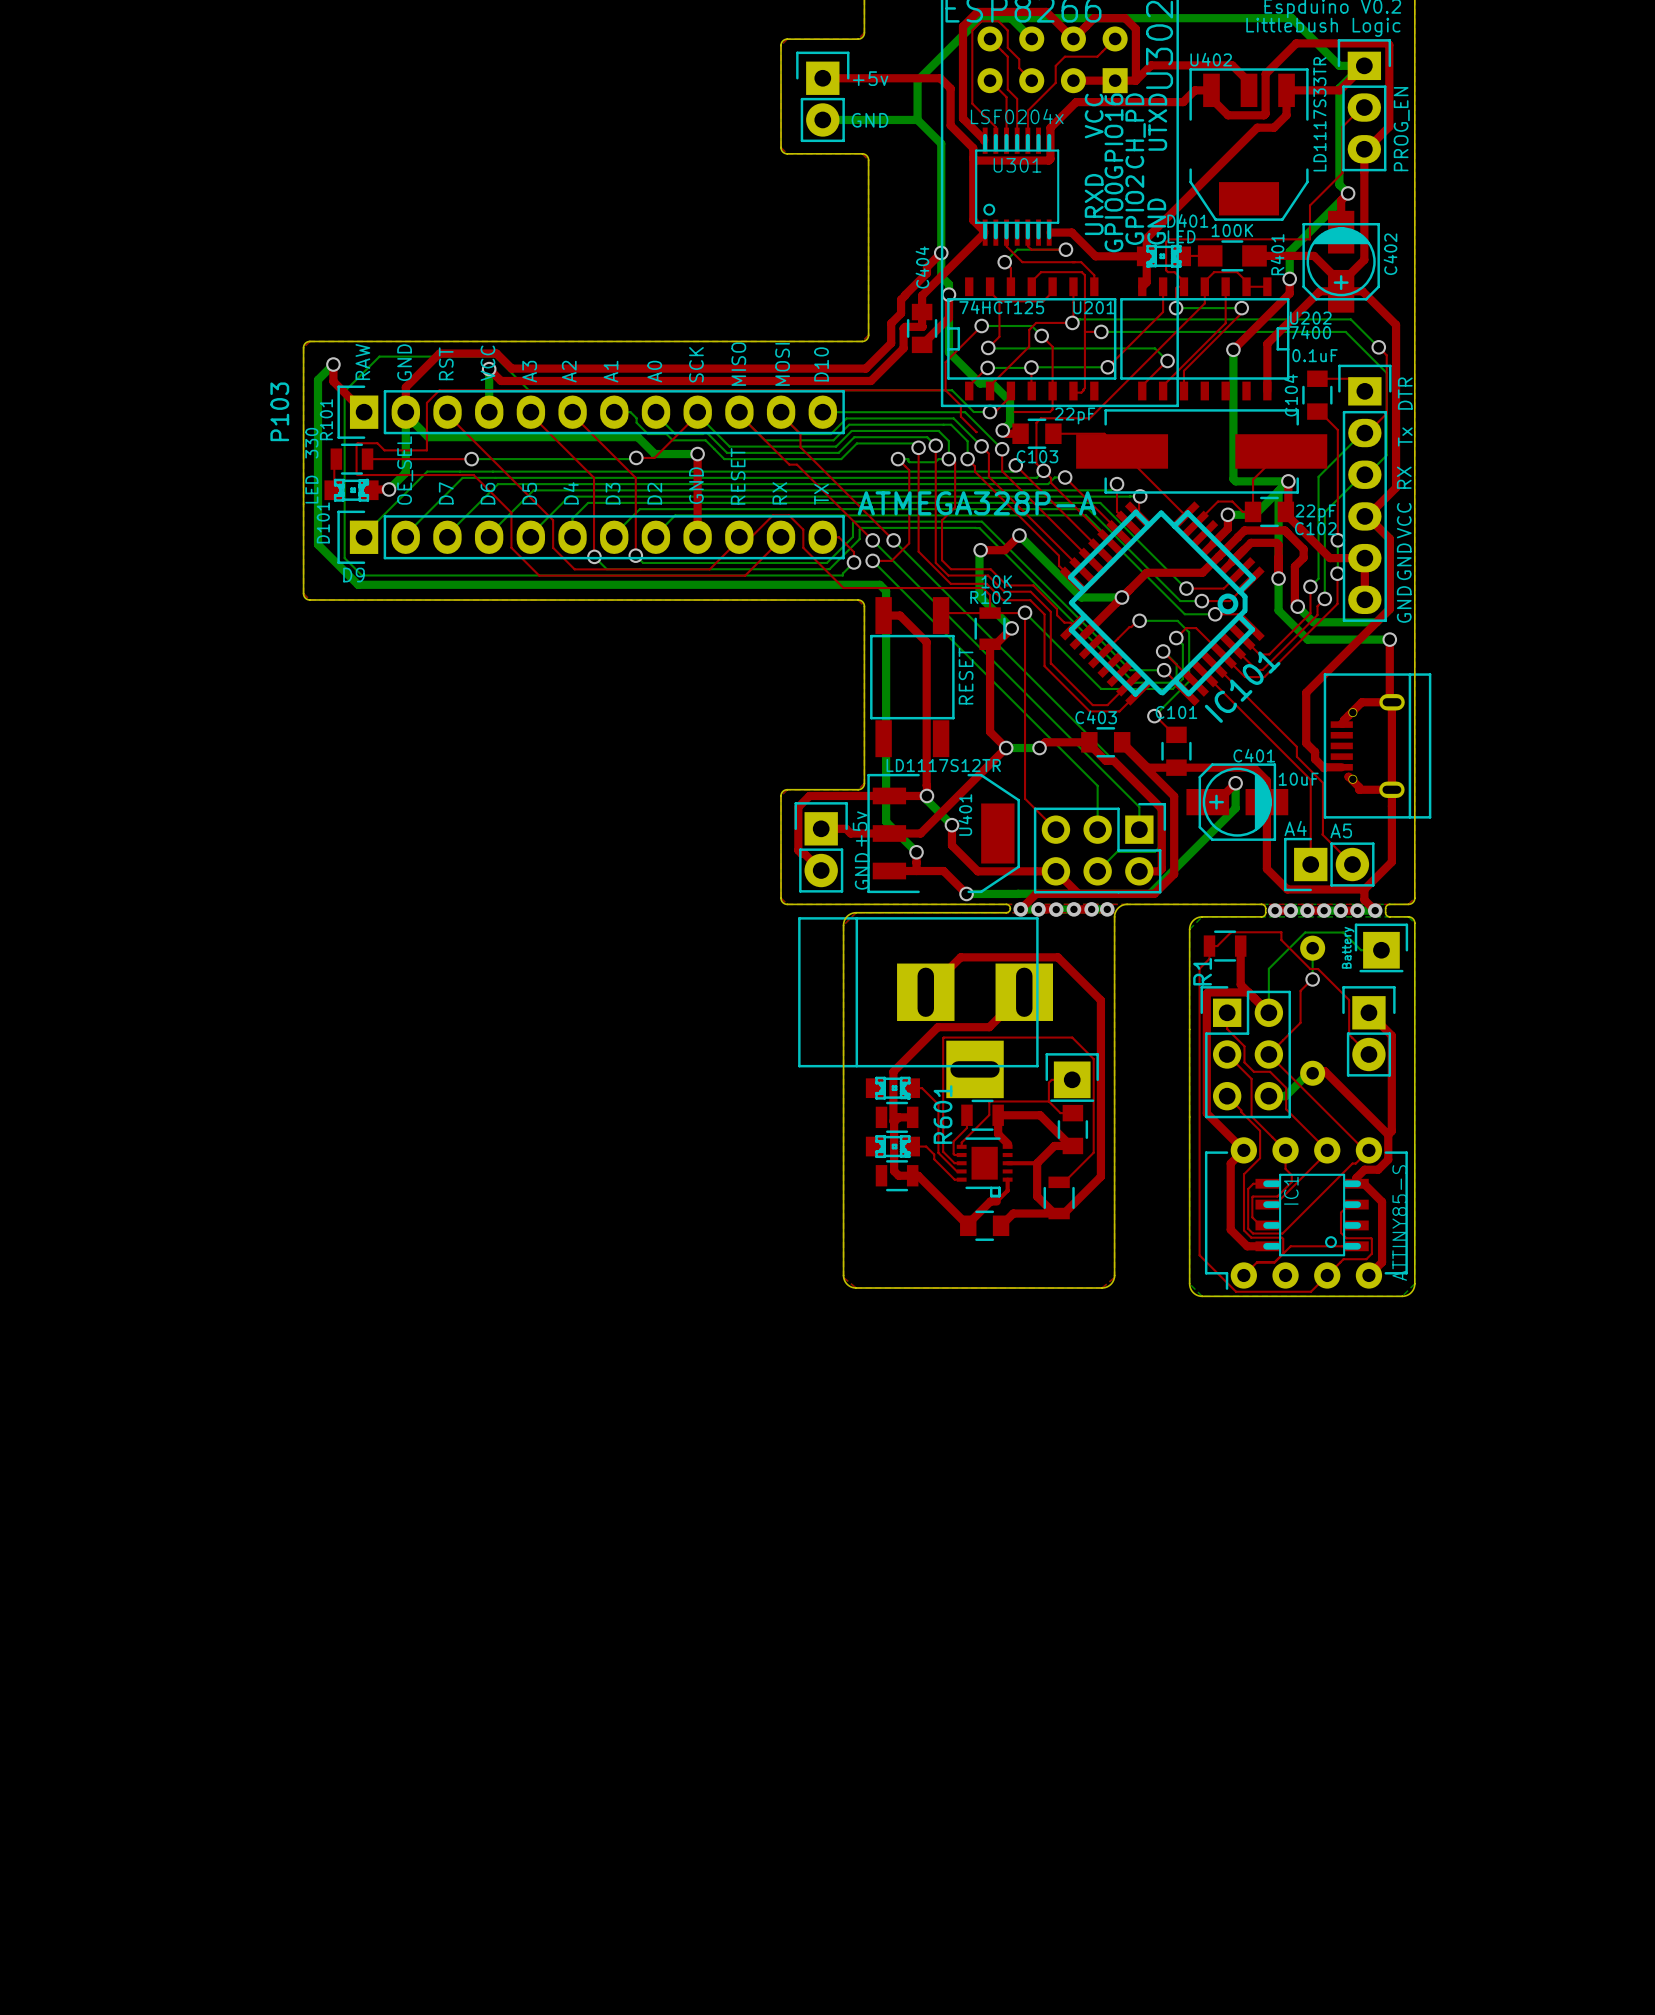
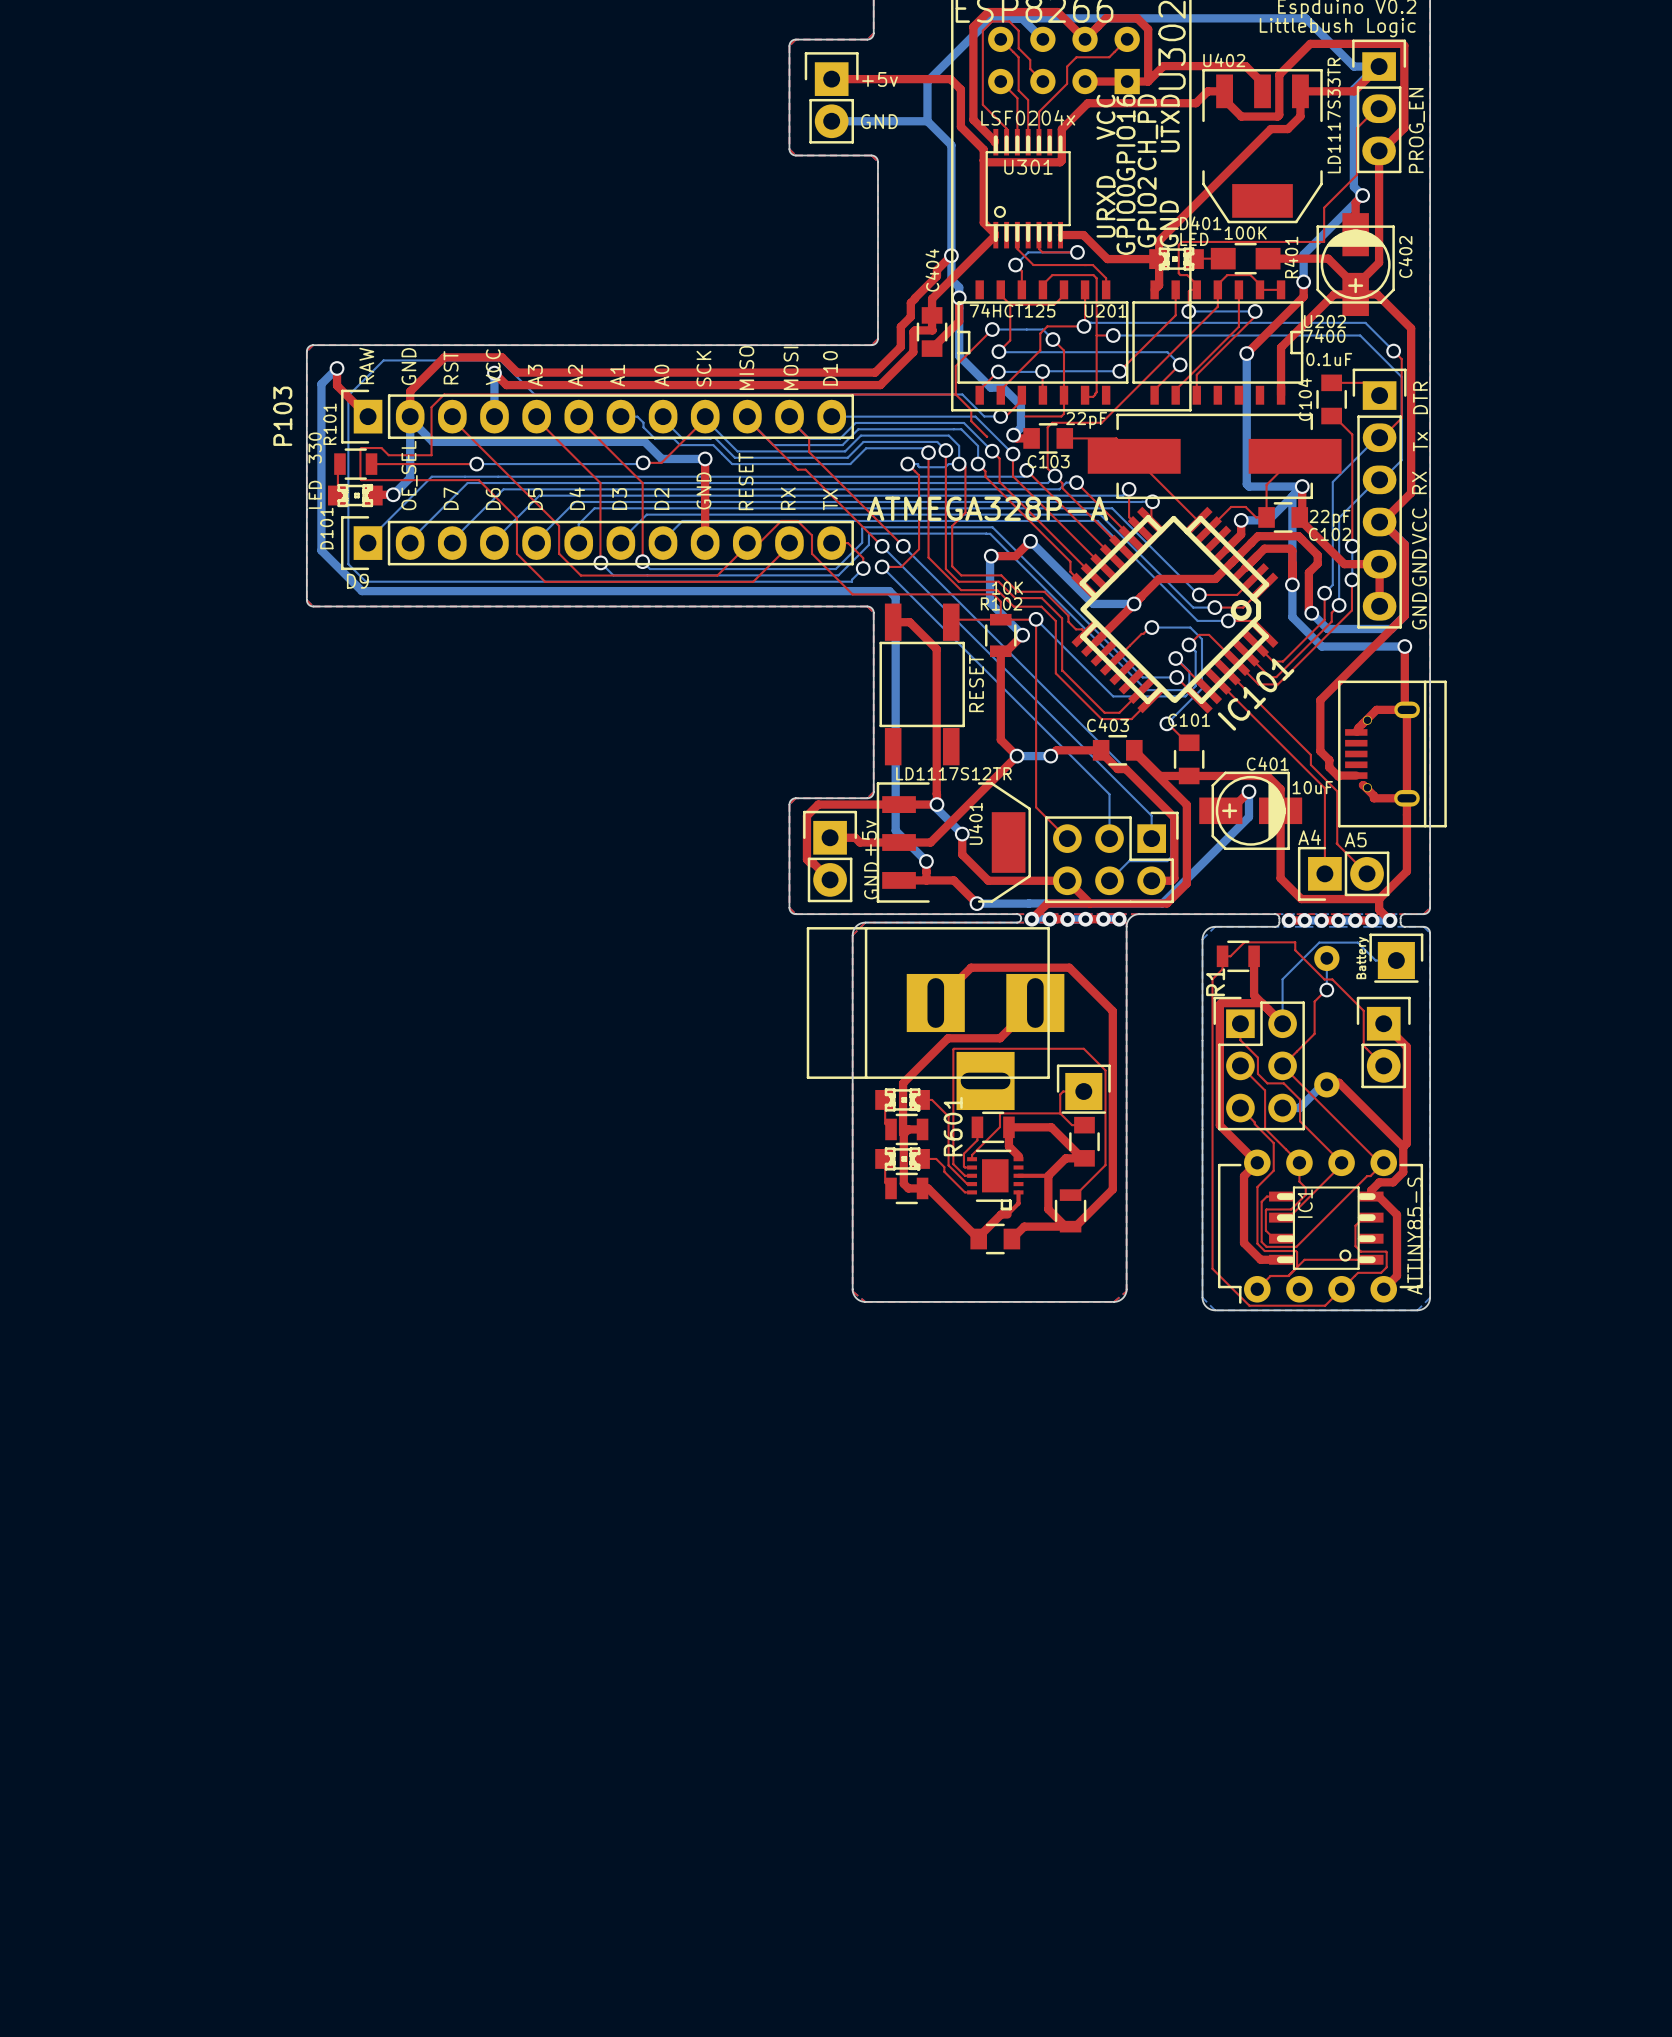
top track: none -> (885, 1099) (885, 1123) (891, 1129)
top track: none -> (885, 1158) (885, 1182) (891, 1188)

